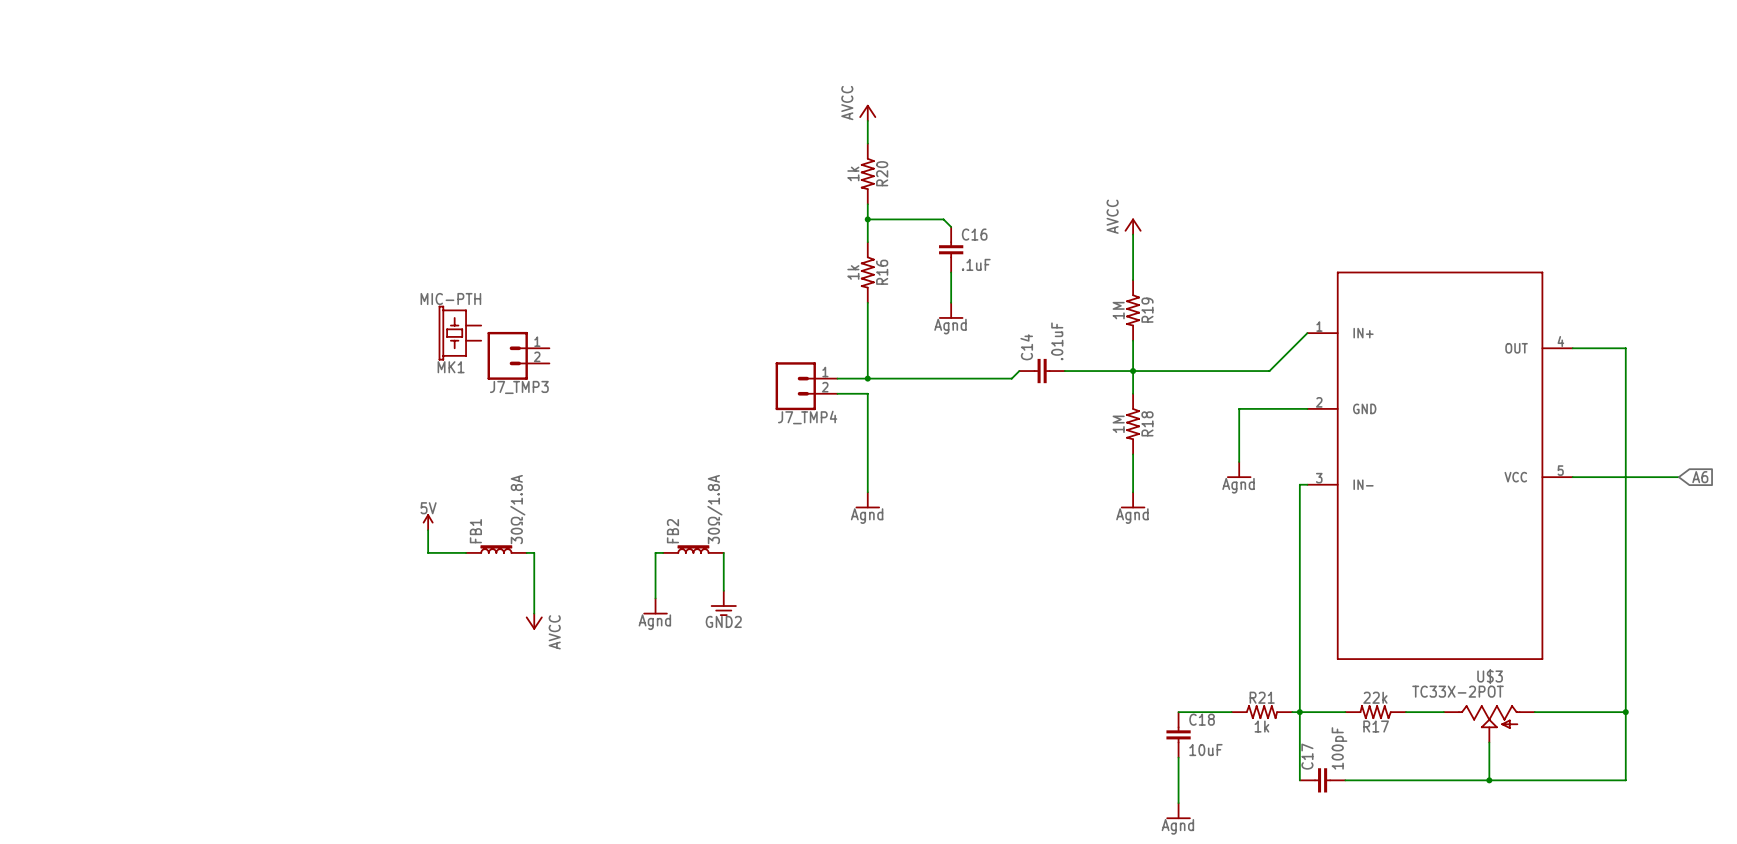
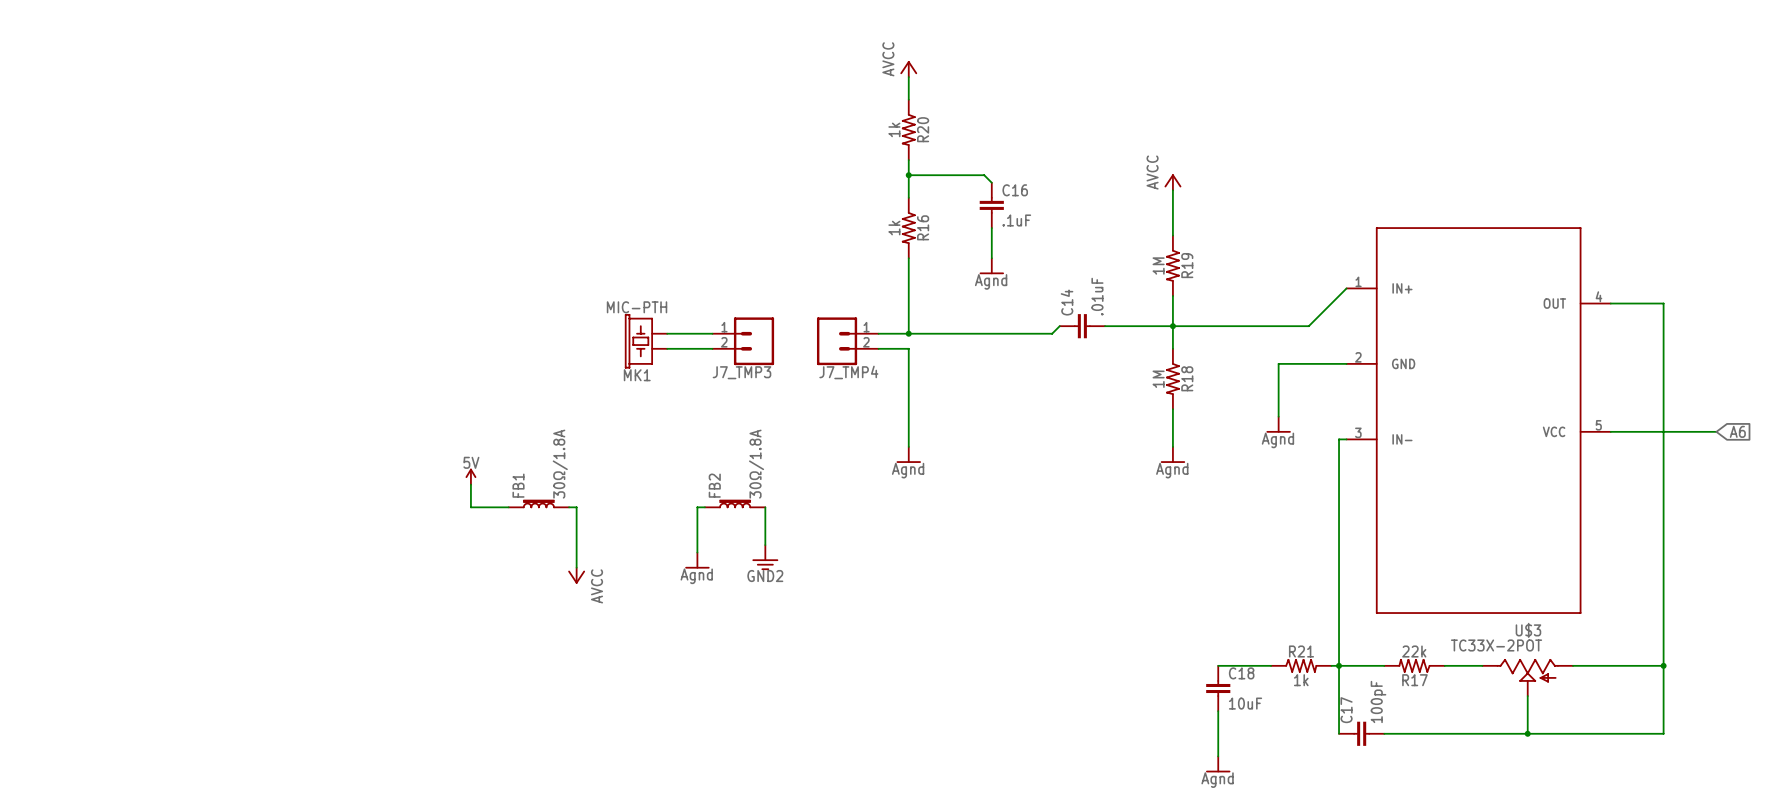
MK1 position: (459, 333) -> (646, 341)
J7_TMP3 flip: as is (507, 355) -> left-right (754, 341)
J7_TMP3 position: (518, 355) -> (743, 341)
wire: none -> (667, 333) (712, 333)
wire: none -> (667, 348) (712, 348)

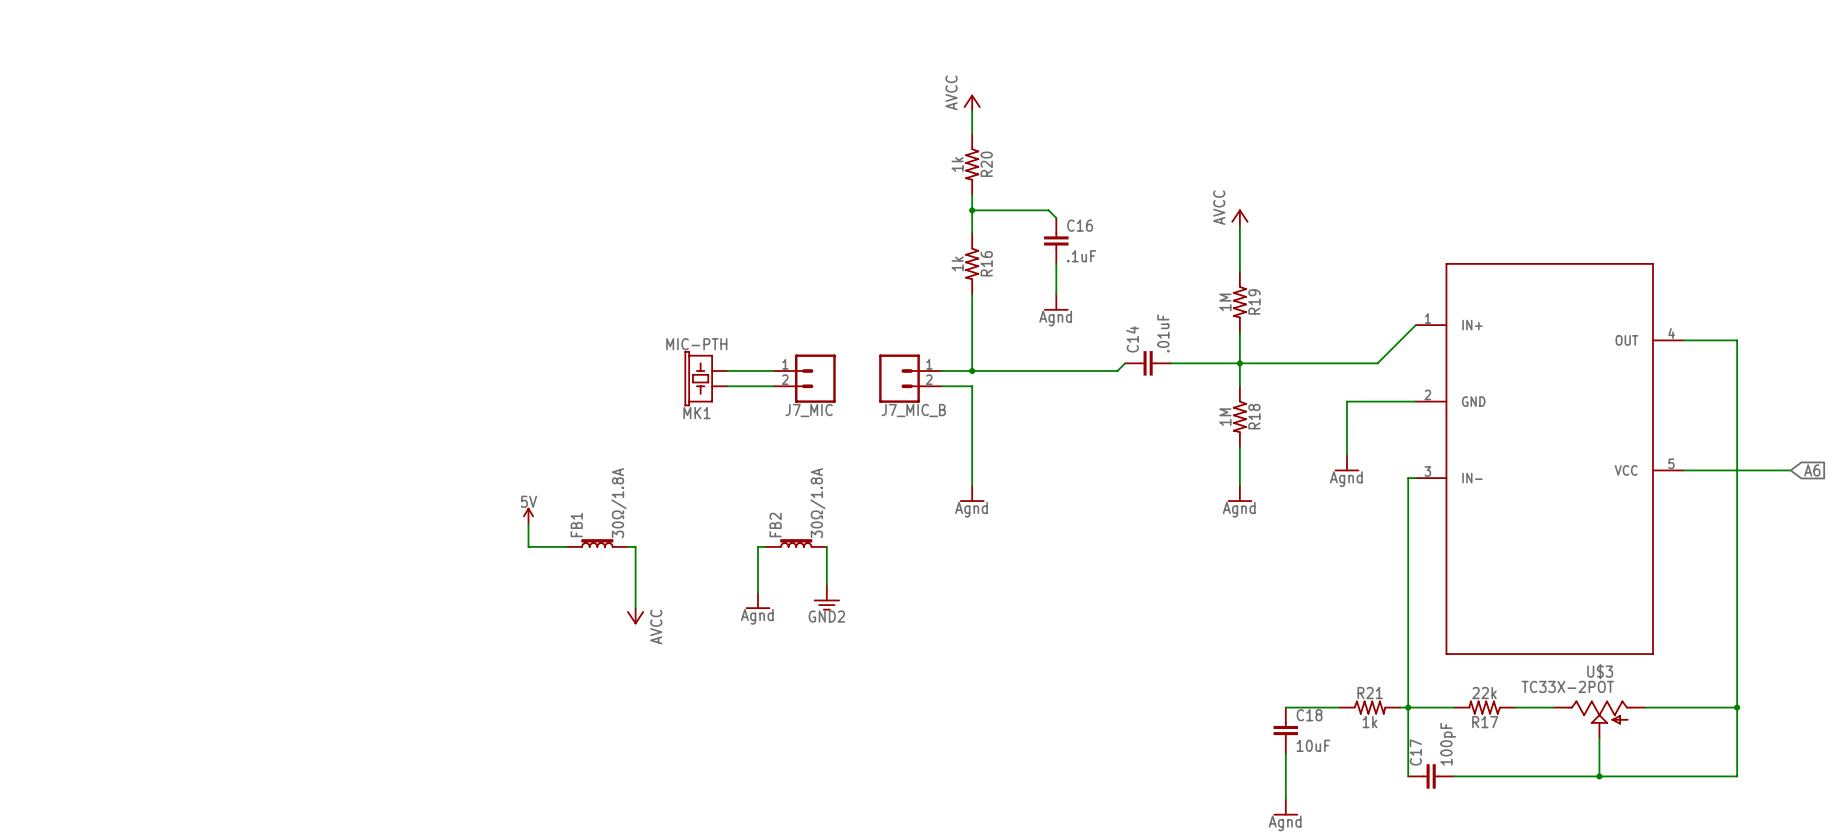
J7_TMP3 name: J7_TMP3 (741, 372) -> J7_MIC (809, 410)
J7_TMP4 name: J7_TMP4 (848, 372) -> J7_MIC_B (913, 410)

